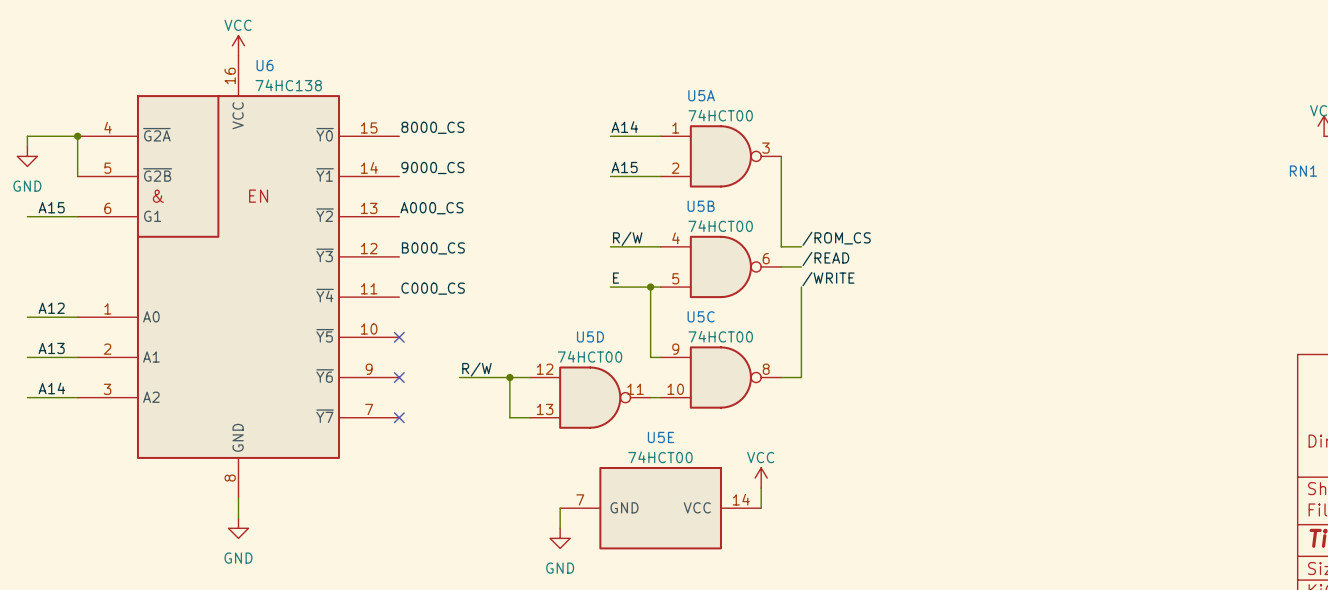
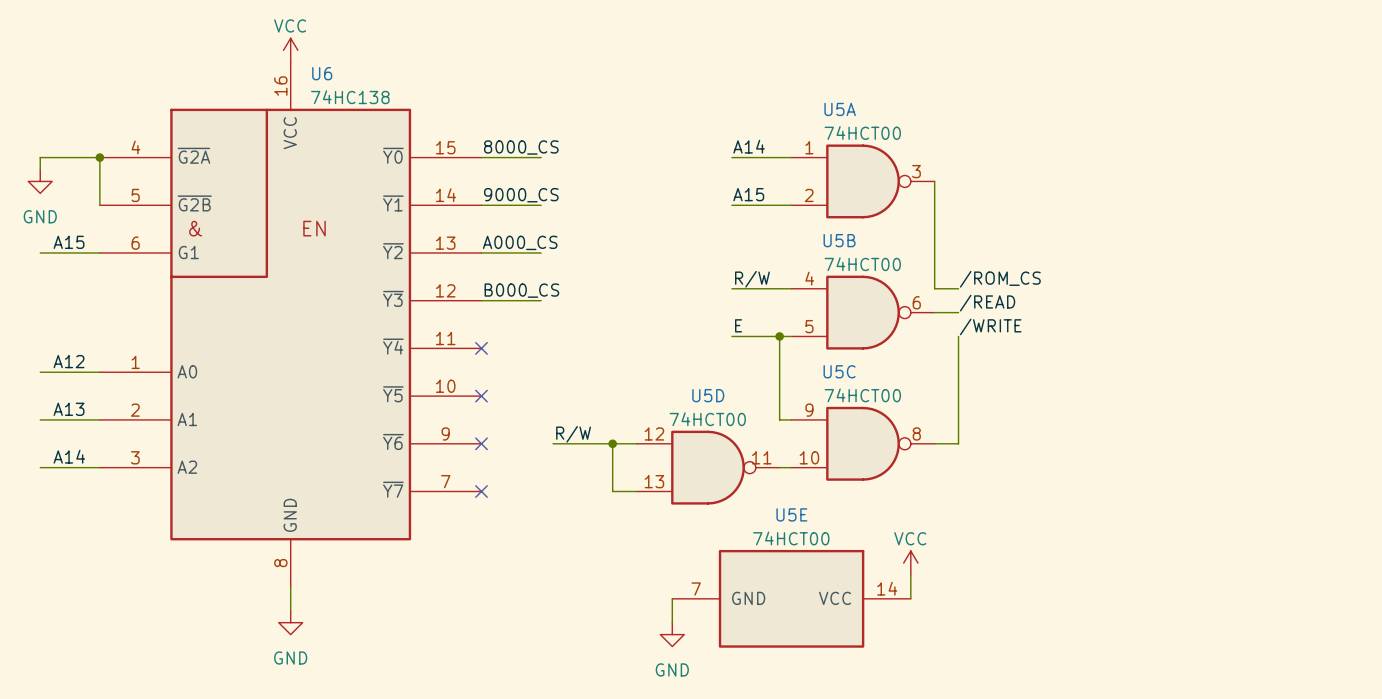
wire: none -> (481, 157) (541, 157)
wire: none -> (481, 205) (541, 205)
wire: none -> (481, 252) (541, 252)
wire: none -> (481, 300) (541, 300)
label: C000_CS (433, 288) -> none
no-connect mark: none -> (481, 348)

